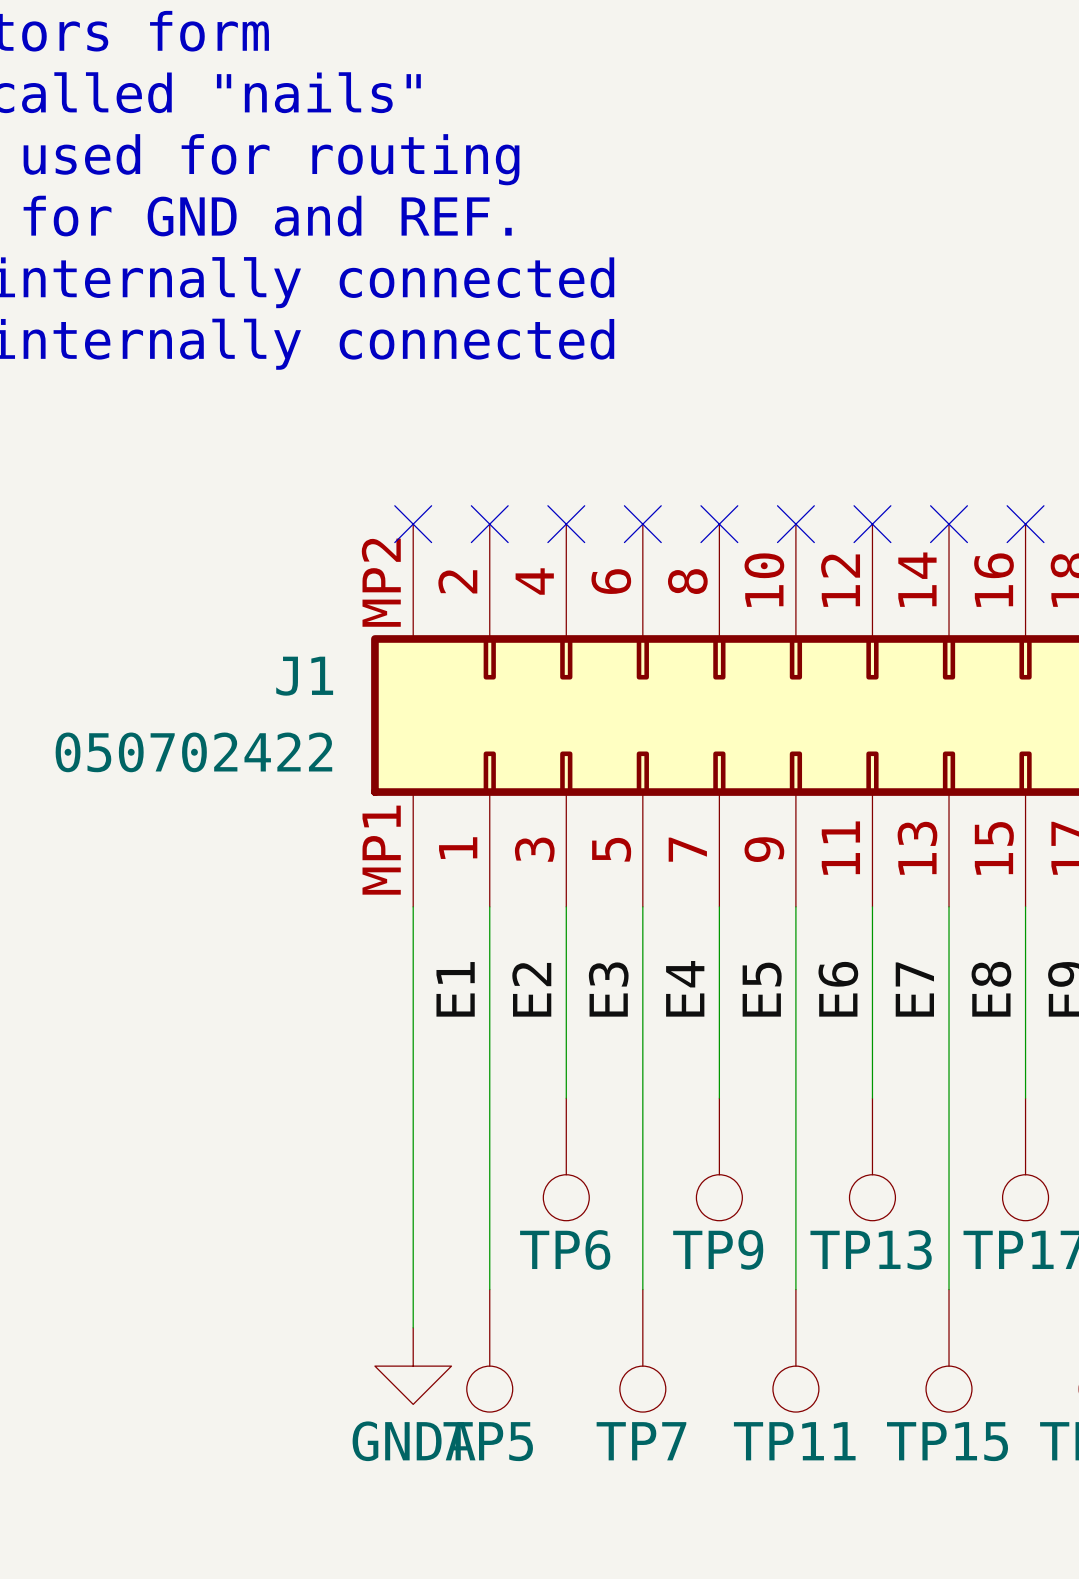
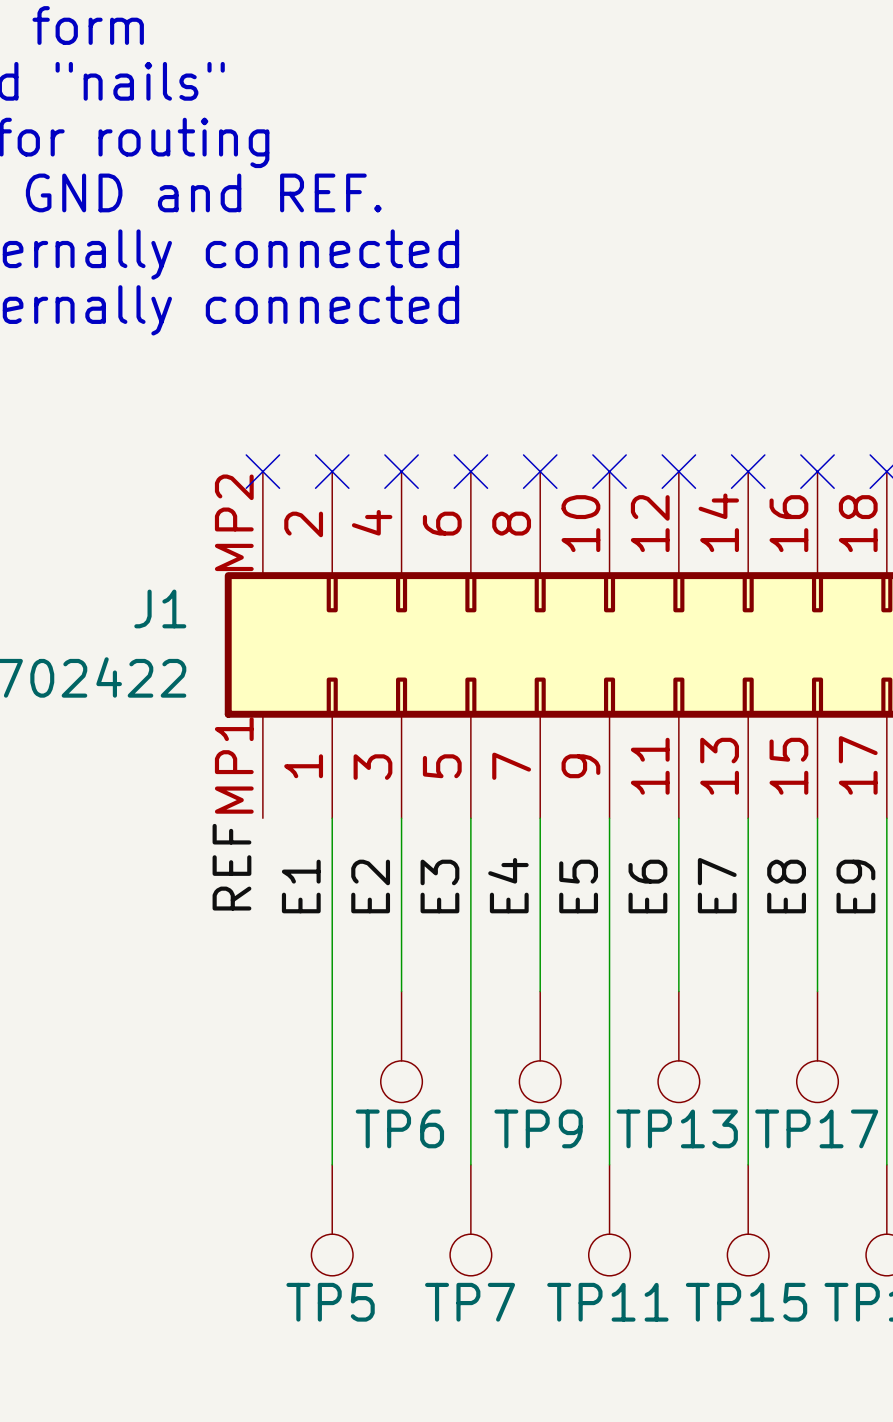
wire: (413, 906) (413, 1327) -> none
label: none -> REF (231, 867)
power symbol: GNDA (413, 1366) -> none

